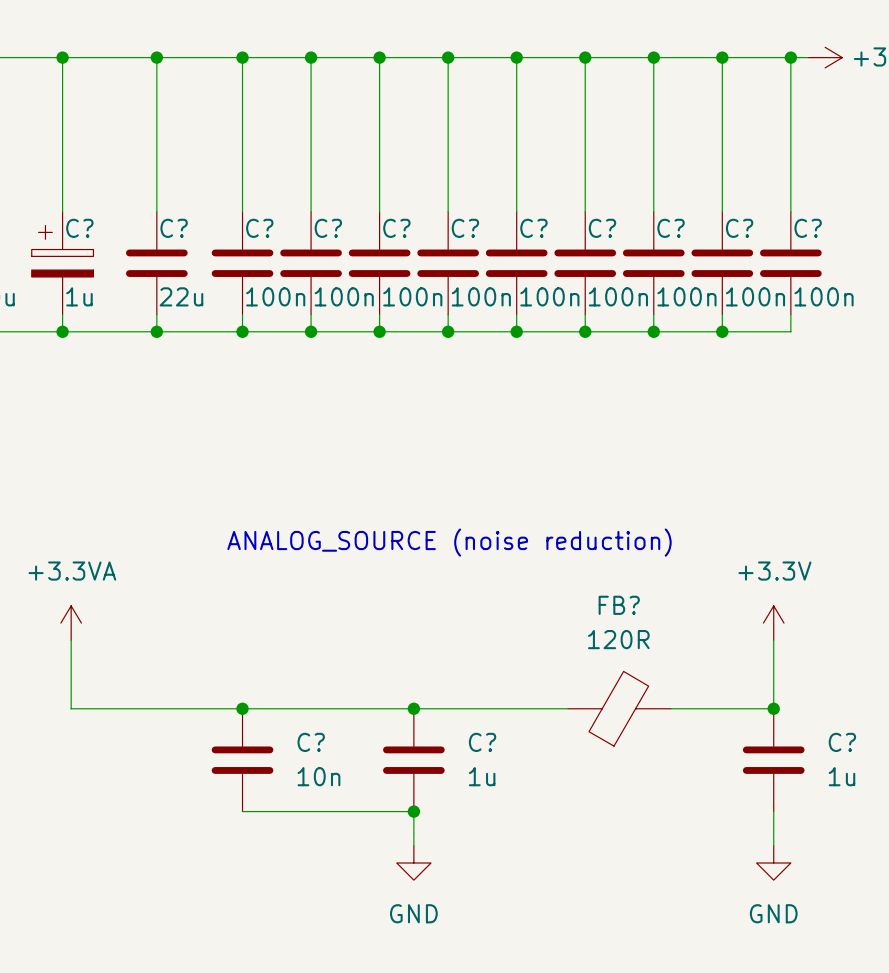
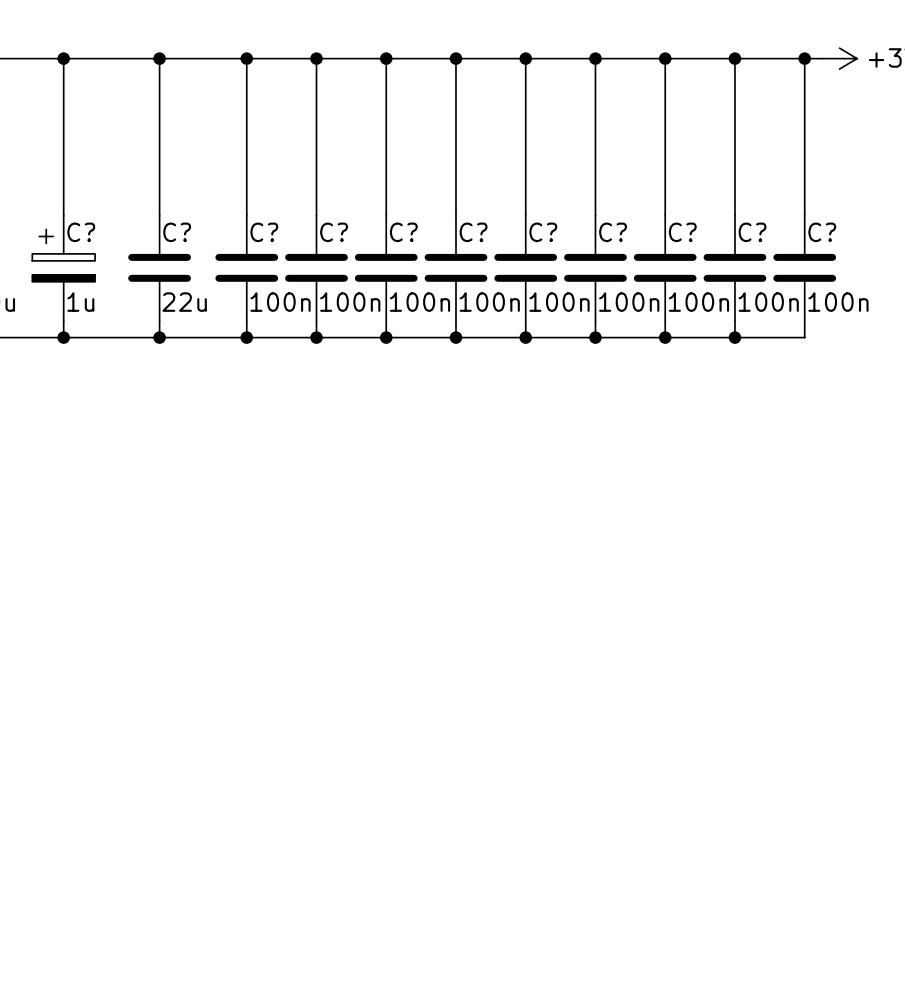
text: ANALOG_SOURCE (noise reduction) (449, 542) -> none
power symbol: +3.3VA (71, 623) -> none
power symbol: +3.3V (773, 623) -> none
wire: (71, 640) (71, 708) (568, 708) -> none
wire: (773, 640) (773, 708) (670, 708) -> none
junction: (242, 708) -> none
junction: (413, 708) -> none
FB?: 120R (619, 708) -> none
junction: (773, 708) -> none
C?: 10n (242, 760) -> none
C?: 1u (413, 760) -> none
C?: 1u (773, 760) -> none
wire: (242, 811) (413, 811) (413, 845) -> none
junction: (413, 811) -> none
wire: (773, 811) (773, 845) -> none
power symbol: GND (413, 862) -> none
power symbol: GND (773, 862) -> none

